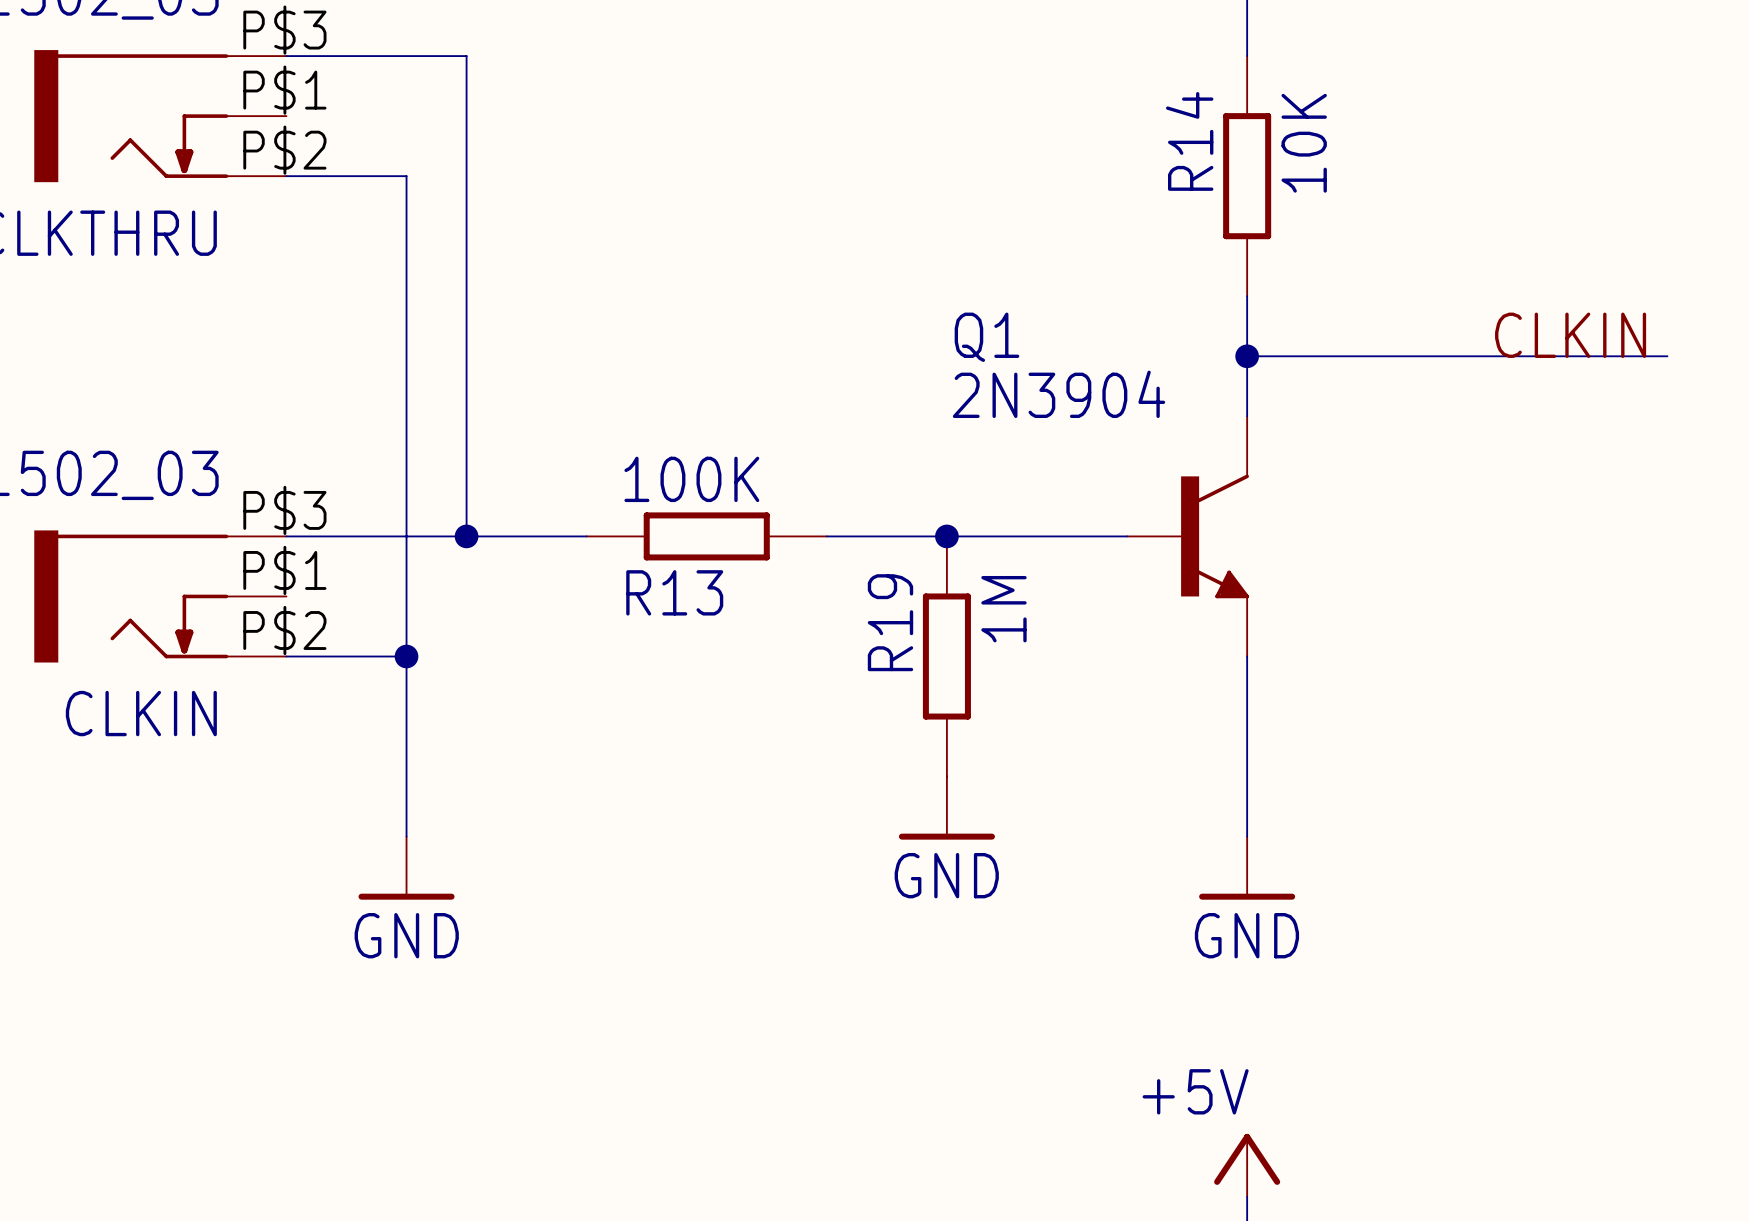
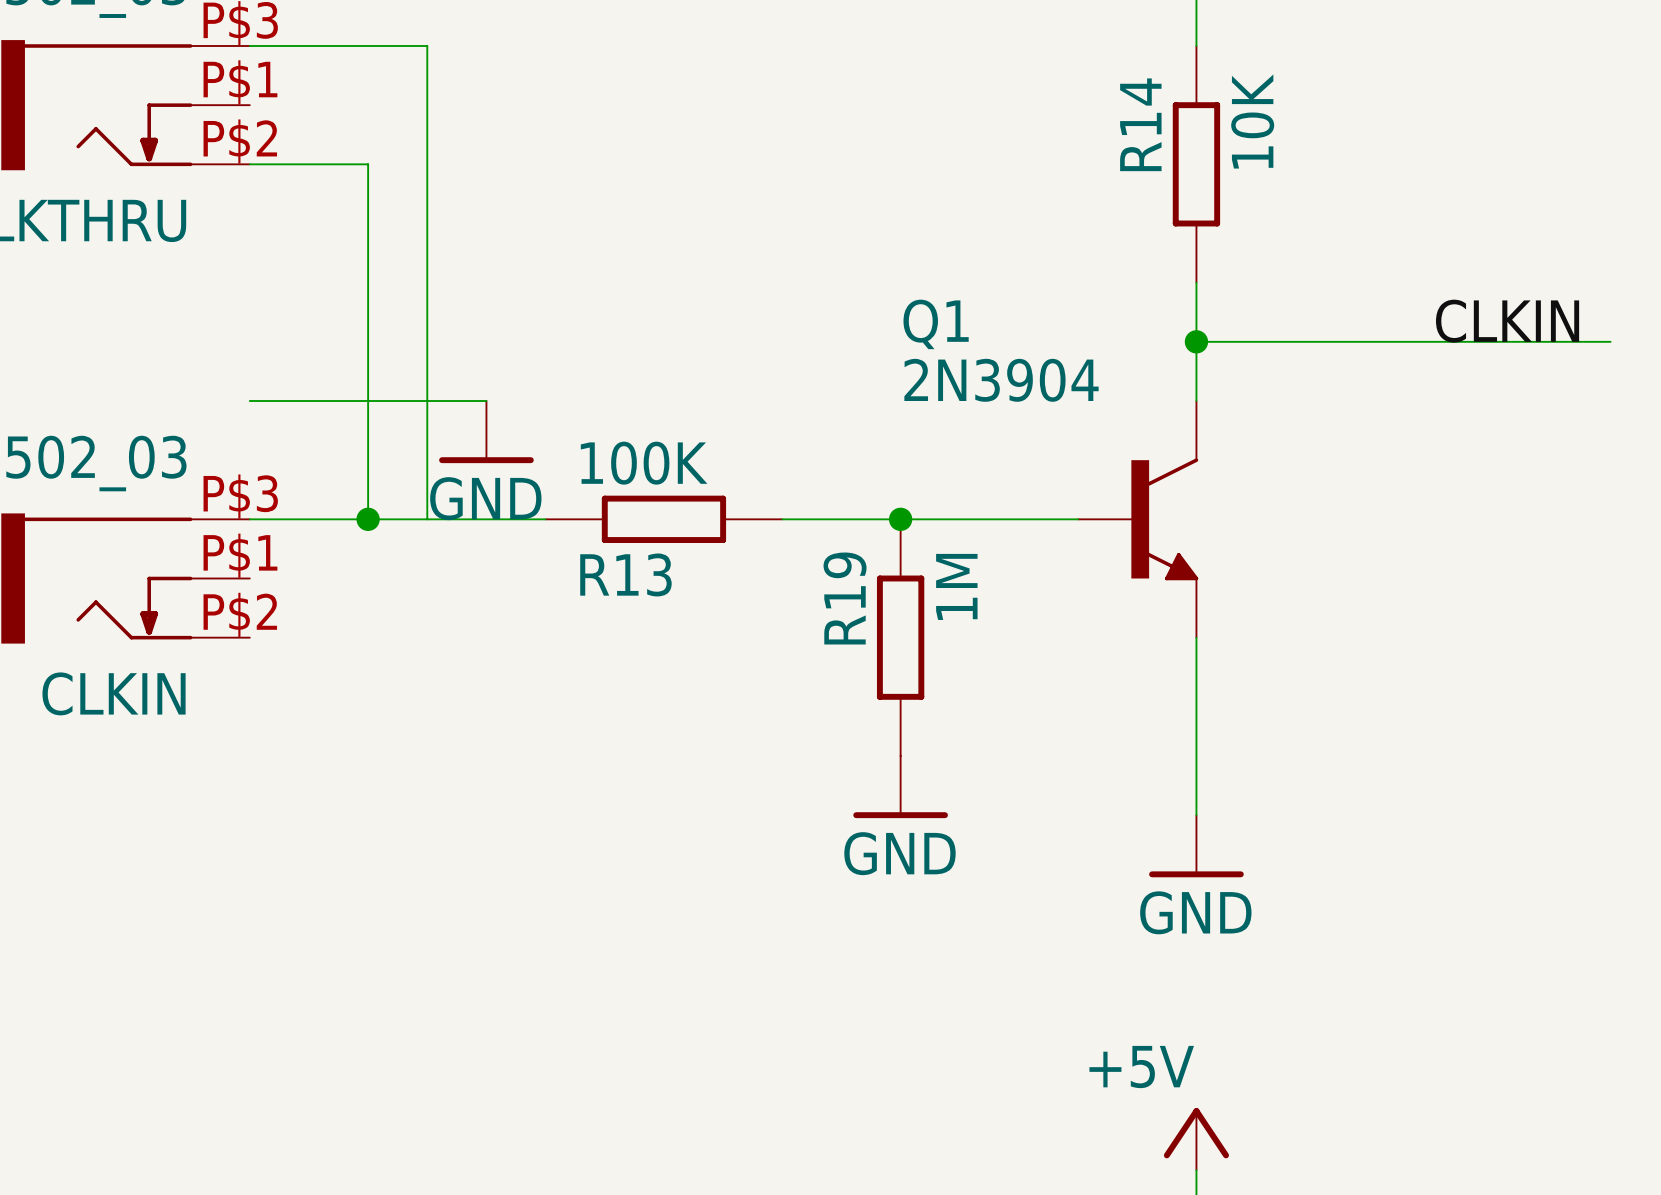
wire: none -> (249, 400) (486, 400)
wire: (406, 536) (406, 836) -> none
junction: none -> (368, 519)
junction: (466, 536) -> none
wire: (286, 656) (406, 656) -> none
junction: (406, 656) -> none
power symbol position: GND (406, 868) -> GND (486, 432)
power symbol text position: GND (406, 935) -> GND (485, 498)

